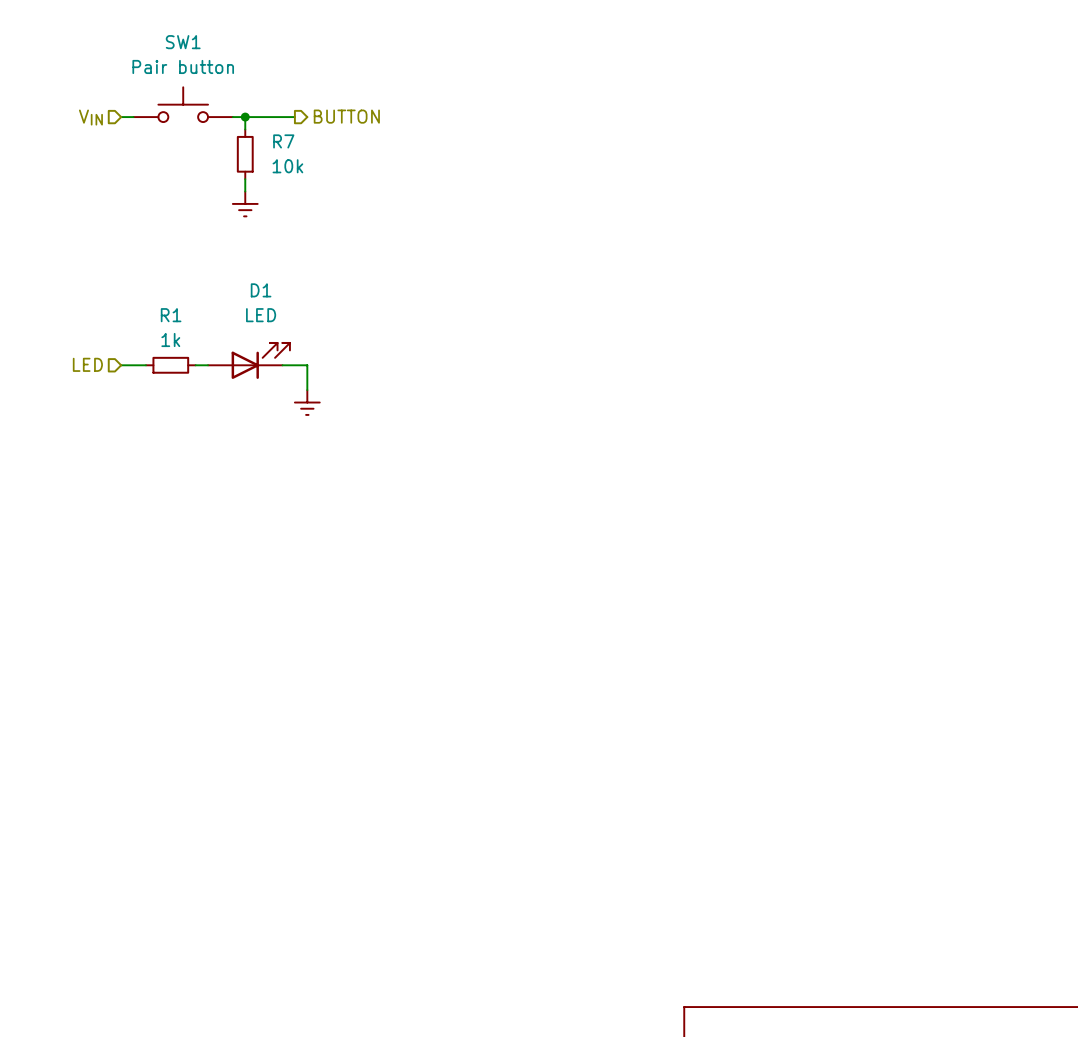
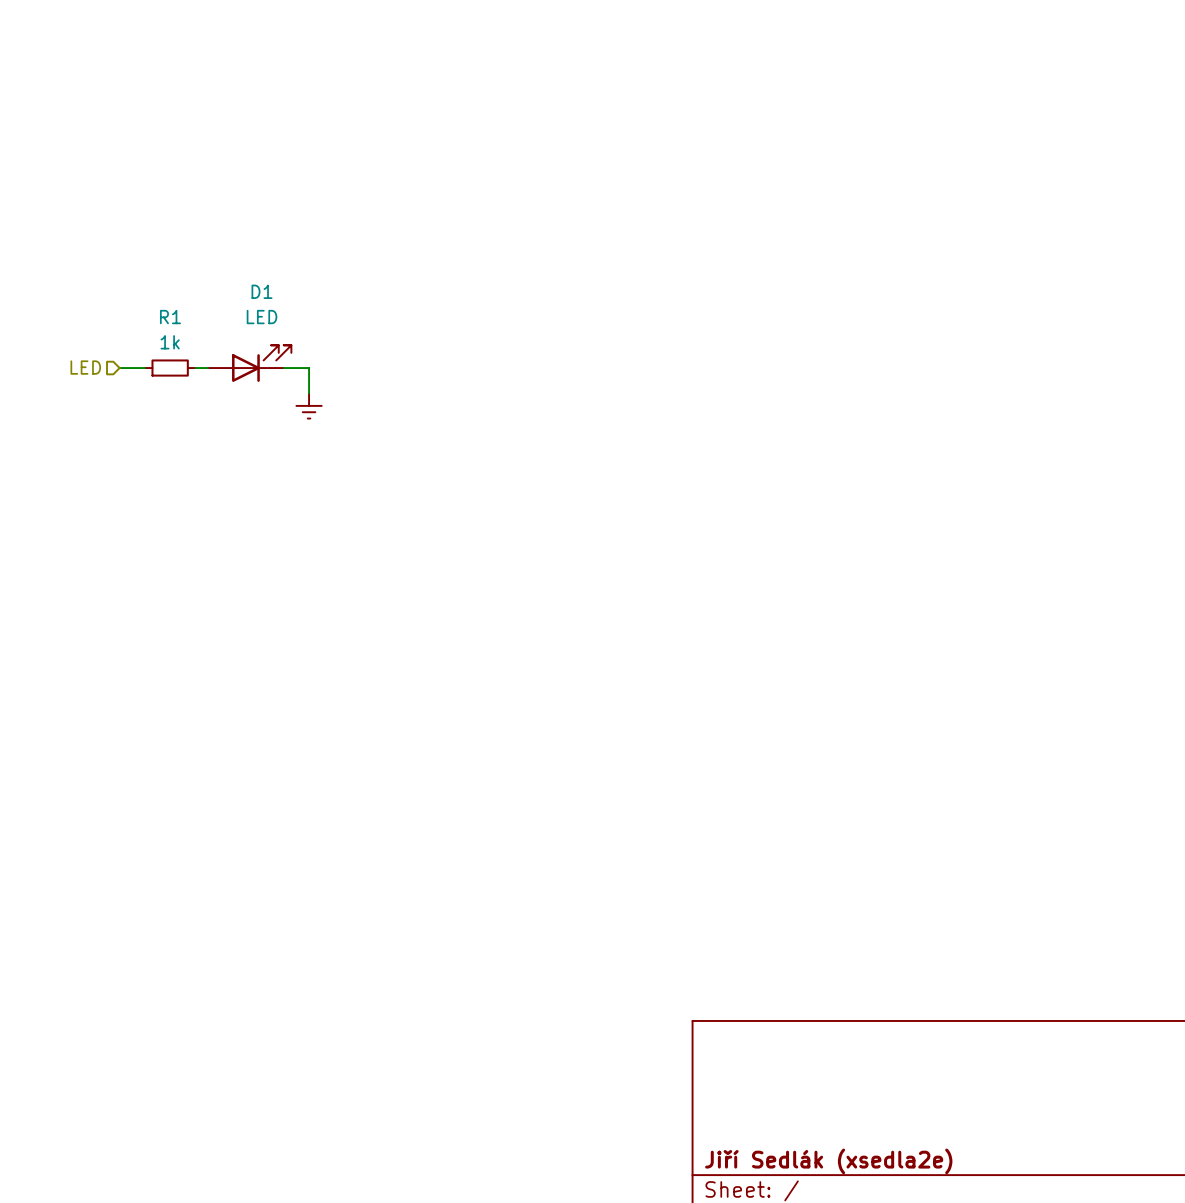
SW1: Pair button (183, 104) -> none
hierarchical label: BUTTON (346, 116) -> none
hierarchical label: VIN (90, 117) -> none
wire: (121, 117) (133, 117) -> none
wire: (232, 117) (294, 117) -> none
wire: (245, 117) (245, 129) -> none
junction: (245, 117) -> none
R7: 10k (245, 154) -> none
wire: (245, 179) (245, 191) -> none
power symbol: (245, 203) -> none

